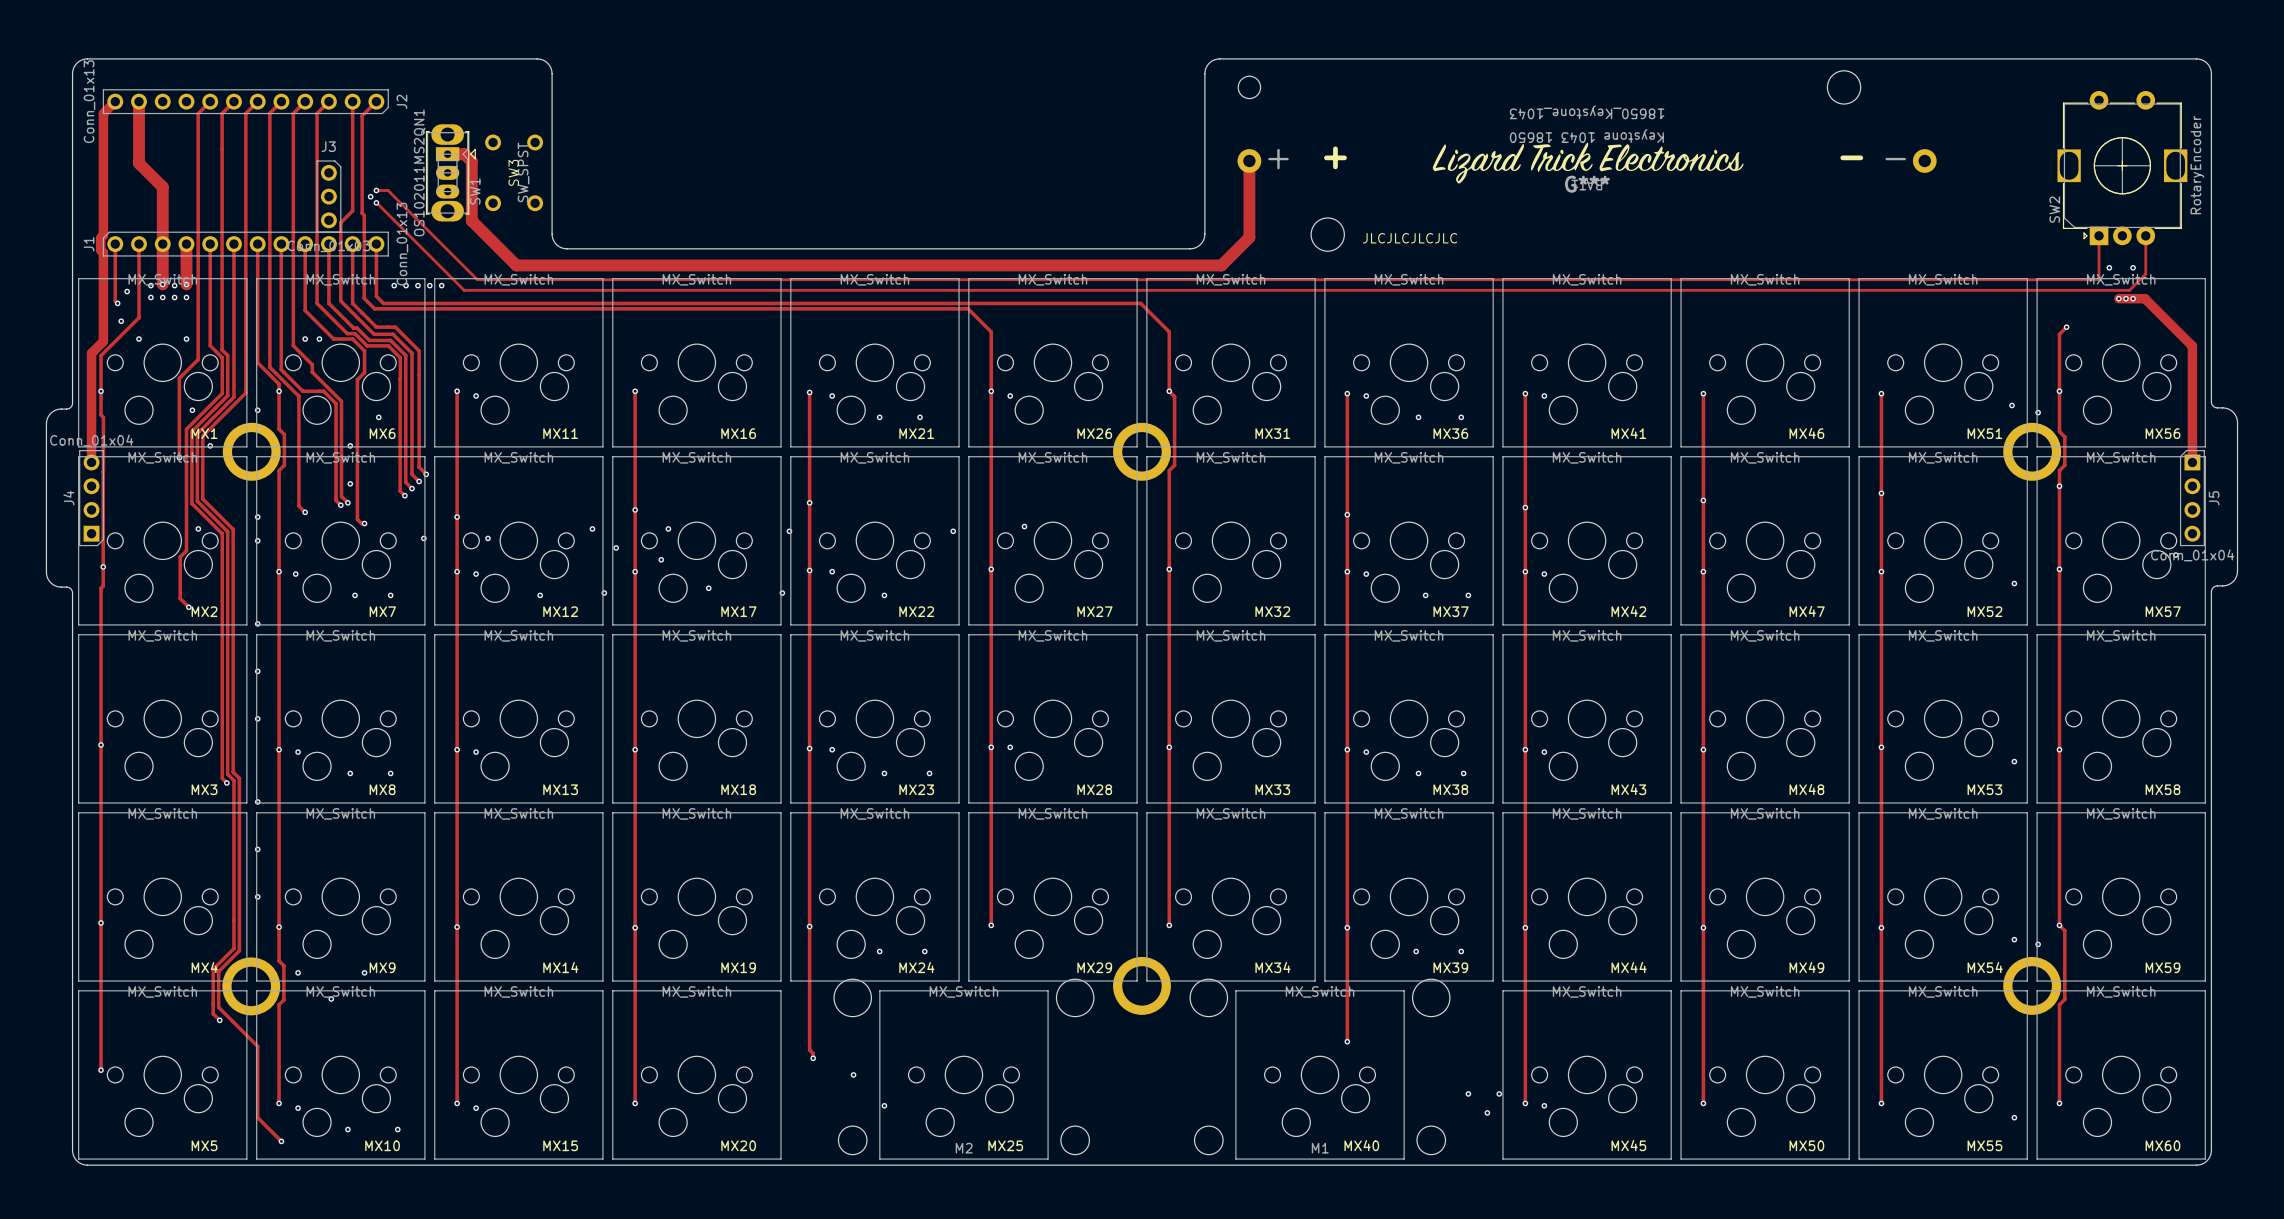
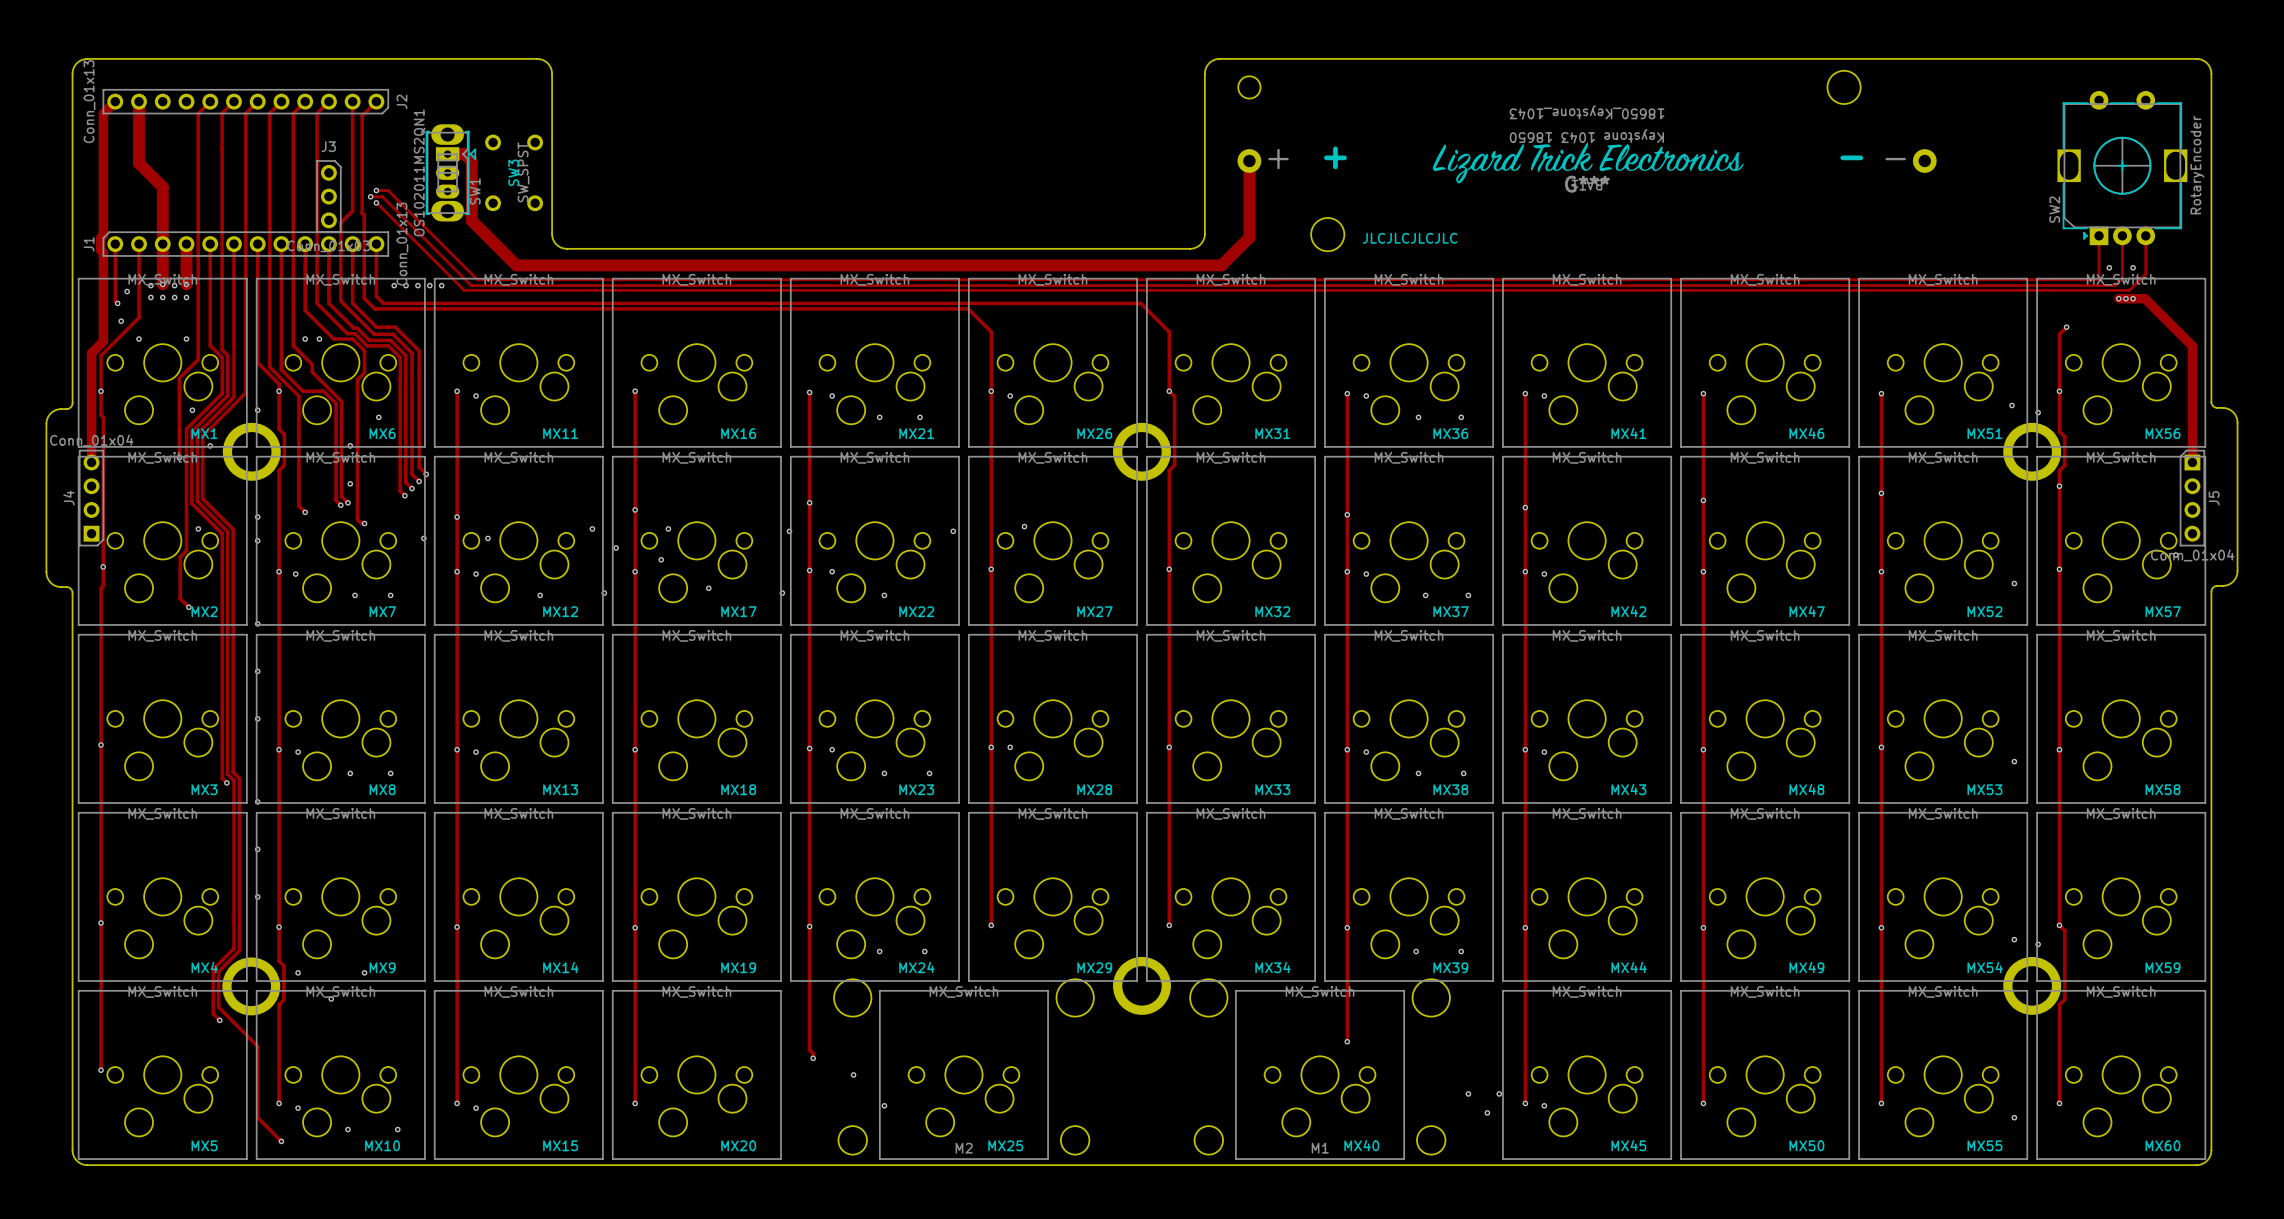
track: none -> (370, 196) (382, 196) (471, 285) (2115, 285) (2122, 278) (2122, 235)

